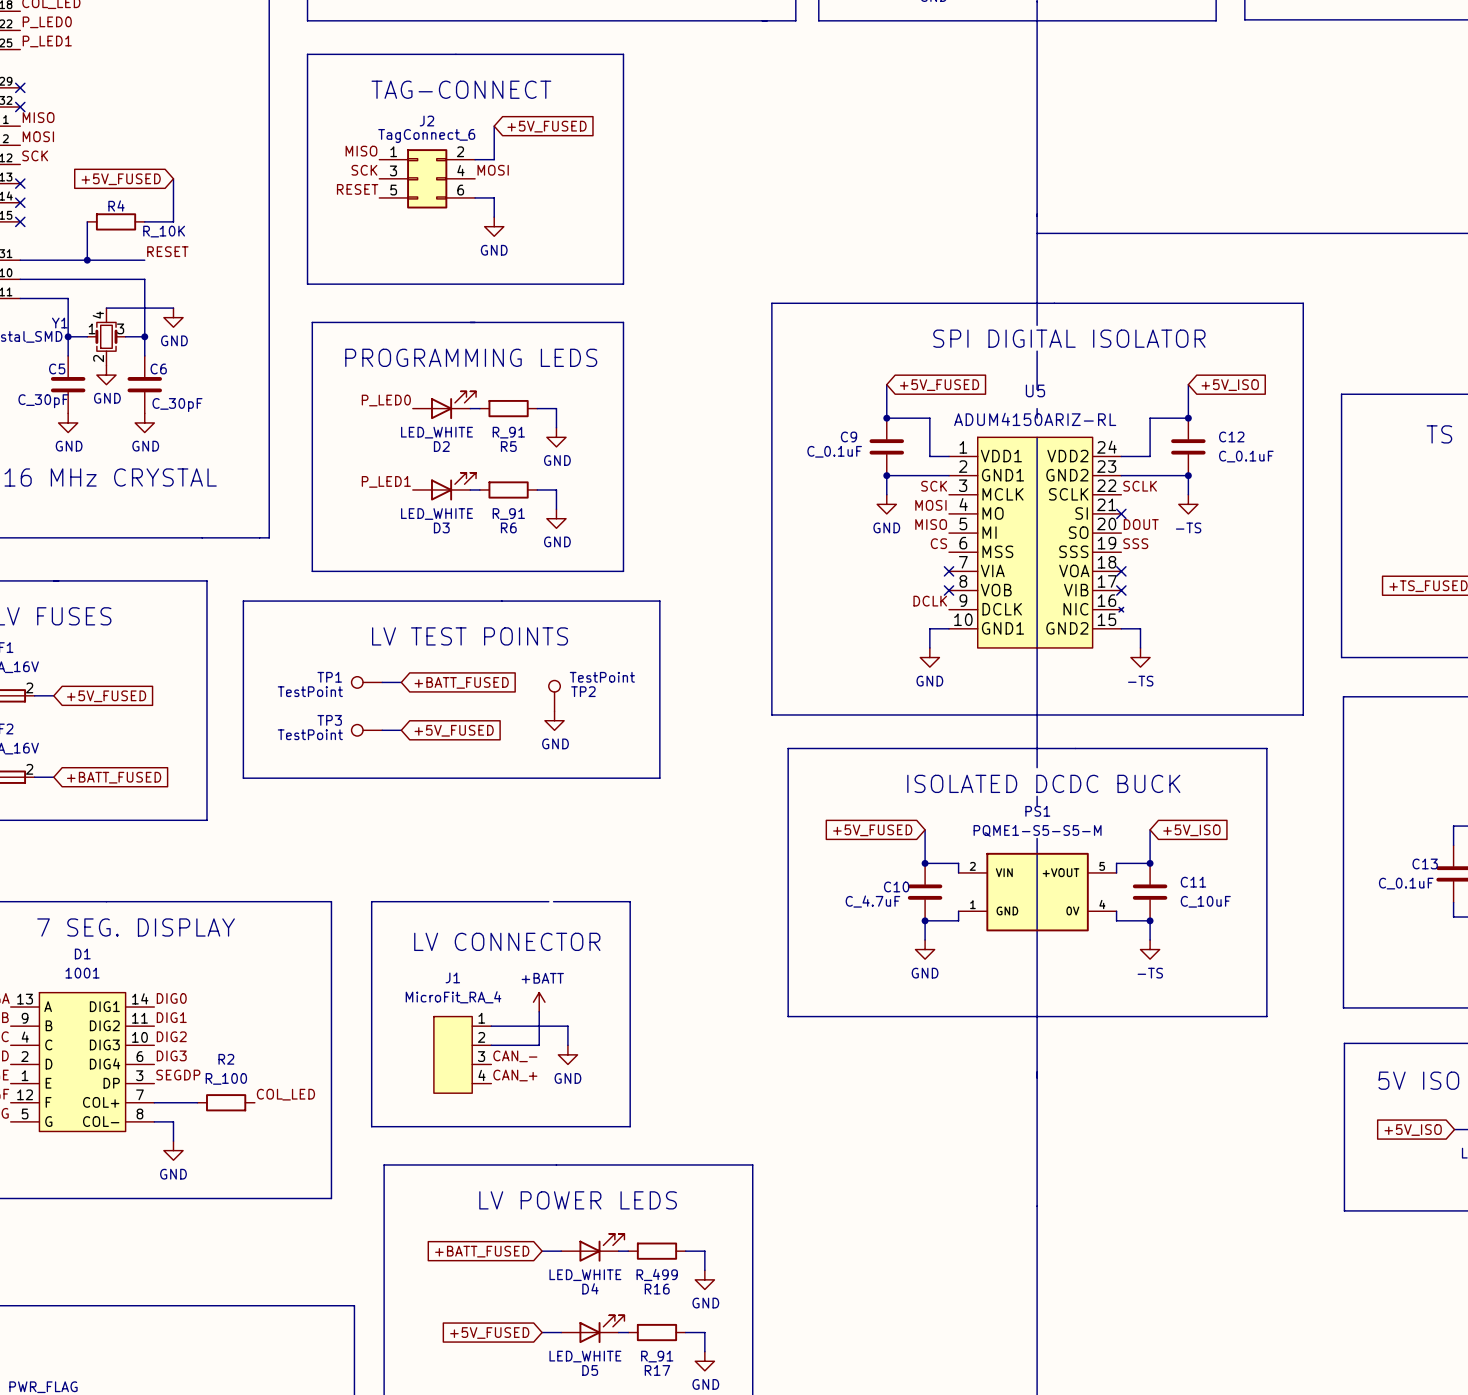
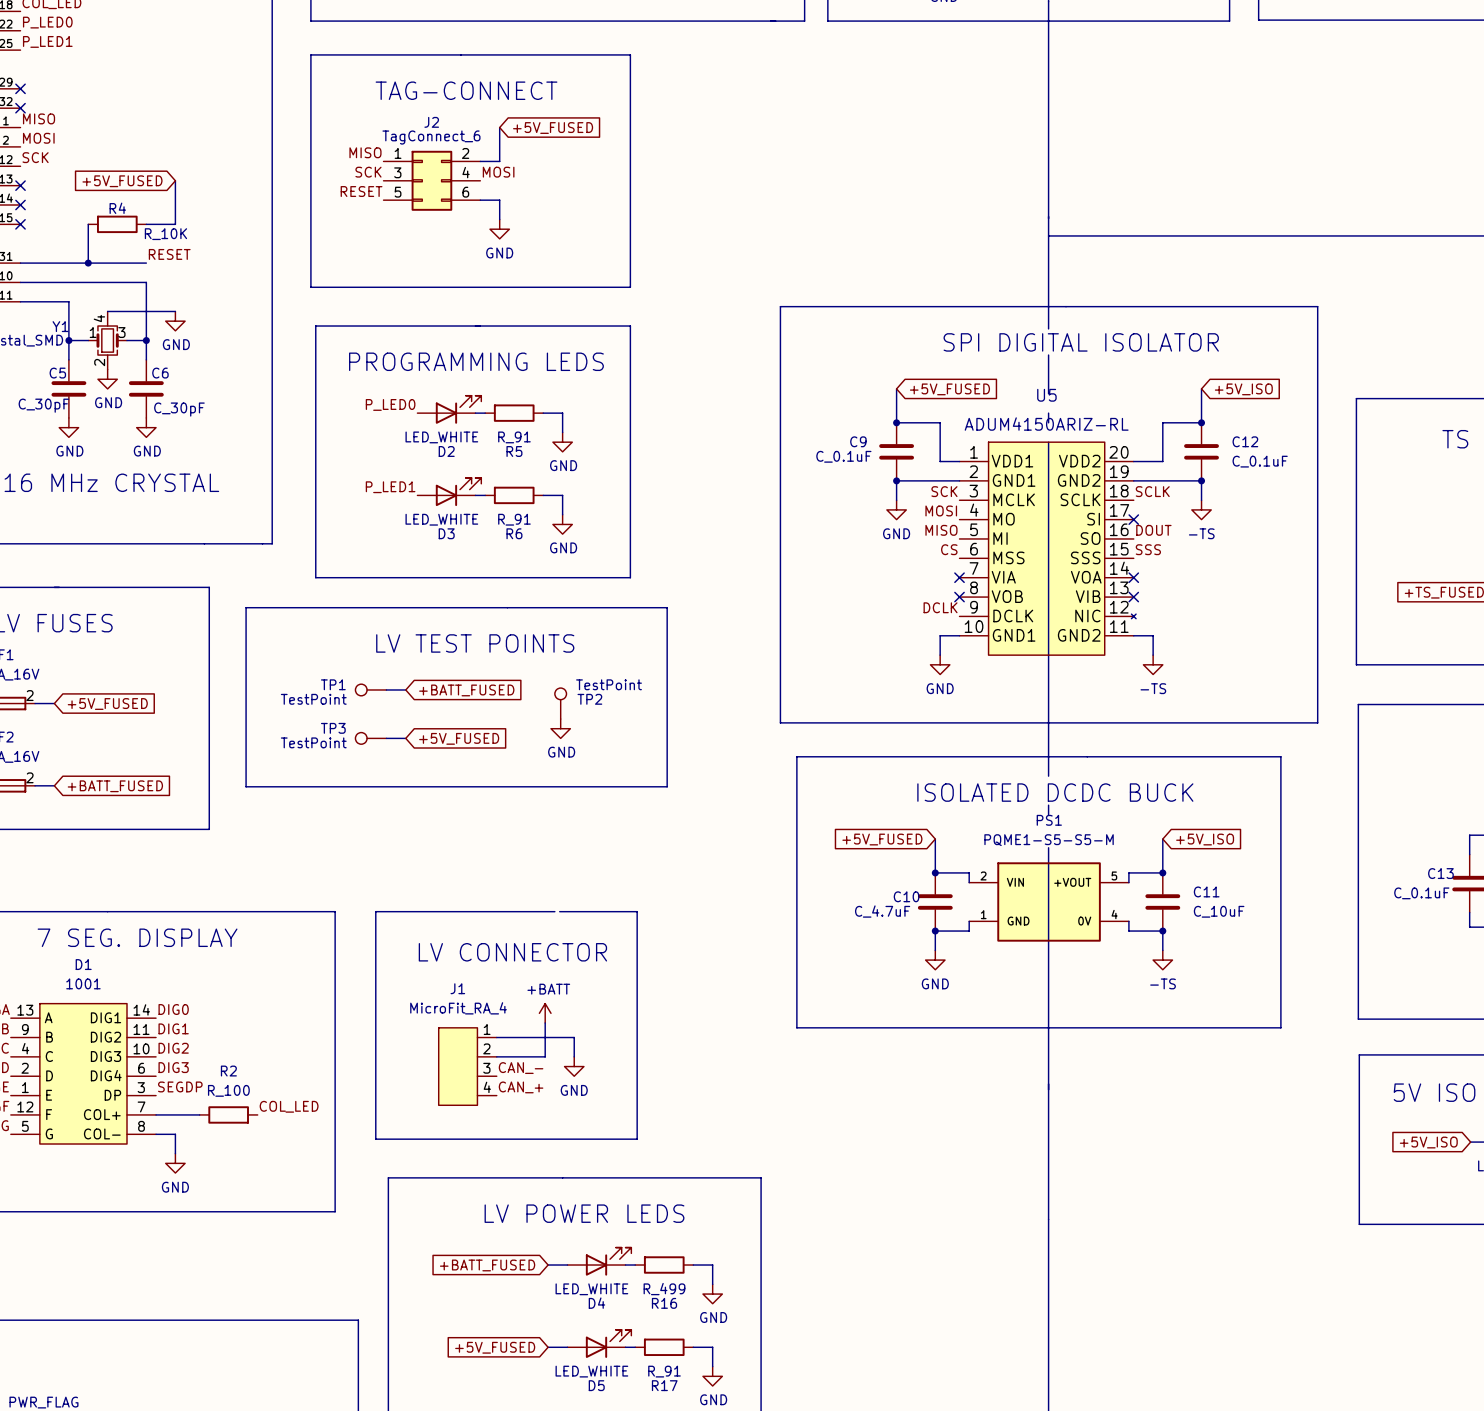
U5 symbol: [949, 437, 1124, 648] -> [959, 442, 1137, 656]

